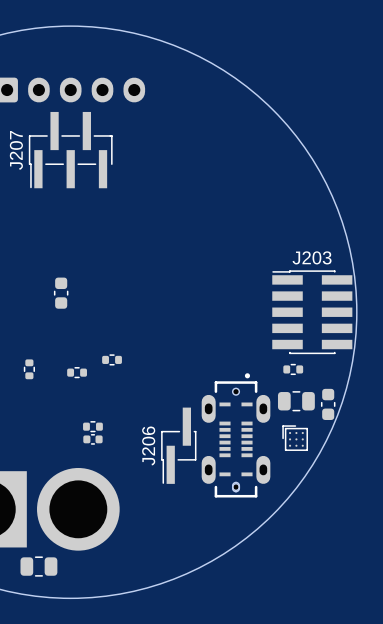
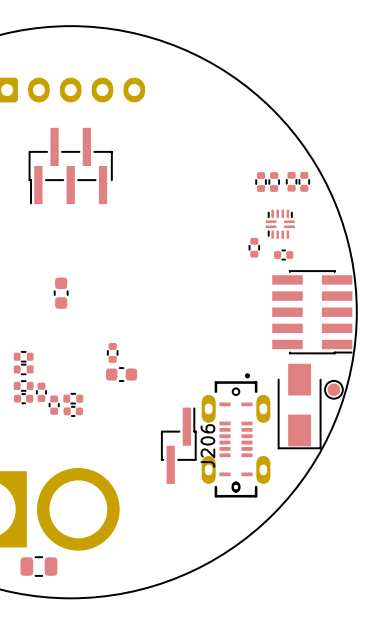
J207: (70, 150) -> none
part: none -> (70, 165)
part: none -> (291, 181)
part: none -> (304, 181)
part: none -> (261, 182)
part: none -> (274, 182)
part: none -> (280, 224)
part: none -> (254, 247)
part: none -> (283, 255)
J203: (312, 312) -> none
part: none -> (312, 312)
part: none -> (23, 356)
part rotation: 0° (112, 359) -> 90° clockwise (112, 352)
part rotation: 0° (29, 369) -> 90° clockwise (23, 369)
part: (293, 369) -> none
part: (77, 372) -> none
part: none -> (23, 385)
part: none -> (333, 389)
part footprint: [277, 391, 315, 412] -> [277, 363, 322, 450]
part: none -> (41, 392)
part: none -> (23, 398)
part: none -> (73, 398)
part rotation: 0° (328, 404) -> 90° clockwise (121, 374)
part position: (328, 404) -> (121, 374)
part: none -> (54, 405)
part: none -> (73, 411)
part: (92, 426) -> none
part: (295, 438) -> none
part: (92, 439) -> none
J206 rotation: 0° (178, 445) -> 180° (178, 445)

